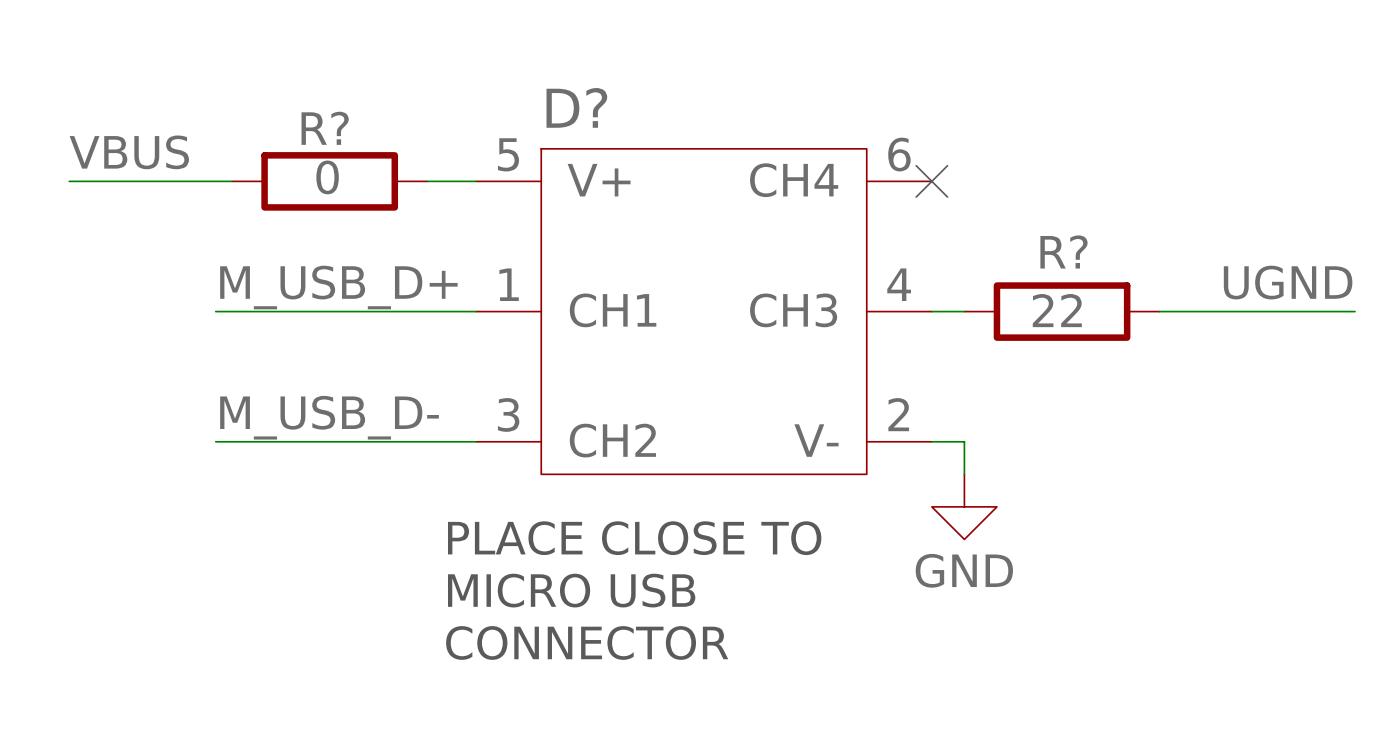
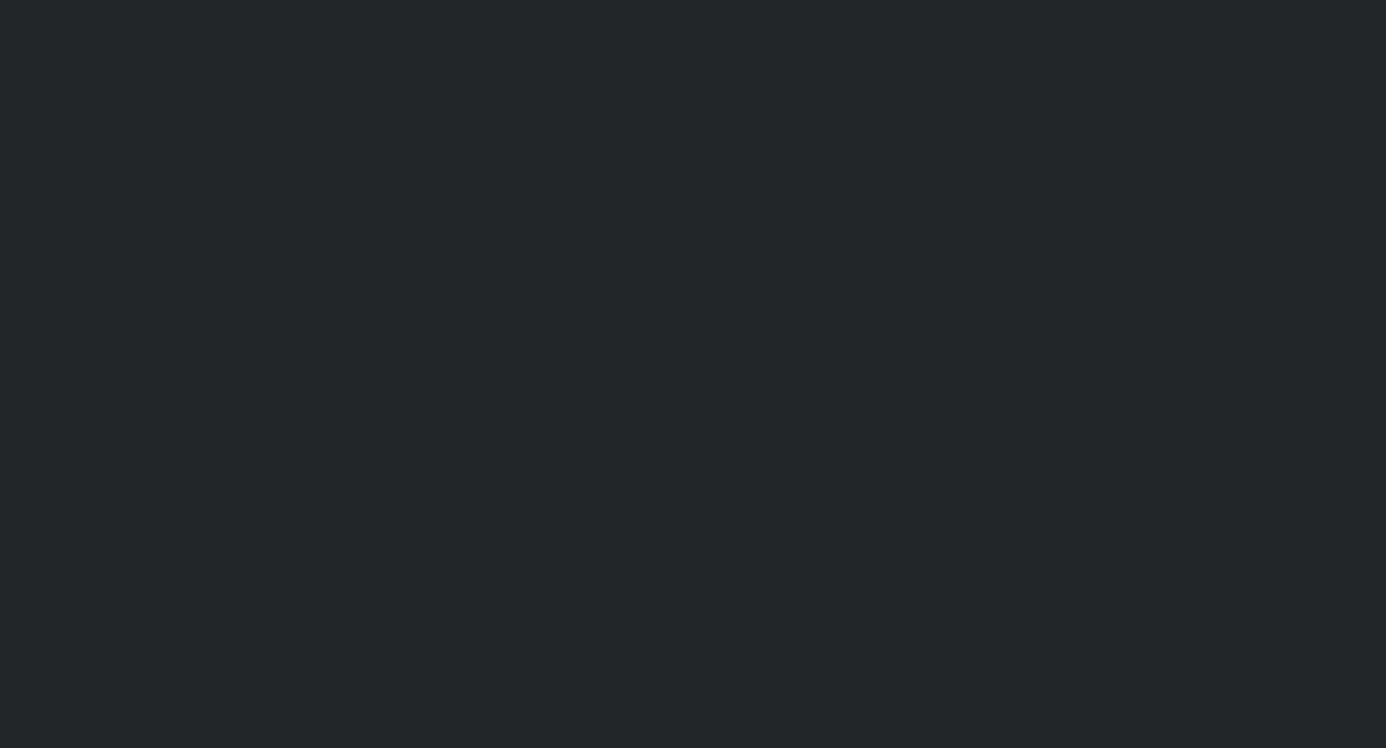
label: VBUS (129, 152) -> none
wire: (69, 181) (232, 181) -> none
R?: (329, 181) -> none
wire: (427, 181) (476, 181) -> none
no-connect mark: (931, 181) -> none
label: UGND (1288, 282) -> none
label: M_USB_D+ (338, 287) -> none
wire: (215, 311) (476, 311) -> none
D?: (704, 311) -> none
wire: (931, 311) (964, 311) -> none
R?: (1062, 311) -> none
wire: (1159, 311) (1355, 311) -> none
label: M_USB_D- (329, 417) -> none
wire: (215, 441) (476, 441) -> none
wire: (931, 441) (964, 441) (964, 474) -> none
power symbol: GND (964, 506) -> none
text: PLACE CLOSE TO (634, 538) -> none
text: MICRO USB (571, 590) -> none
text: CONNECTOR (587, 642) -> none

